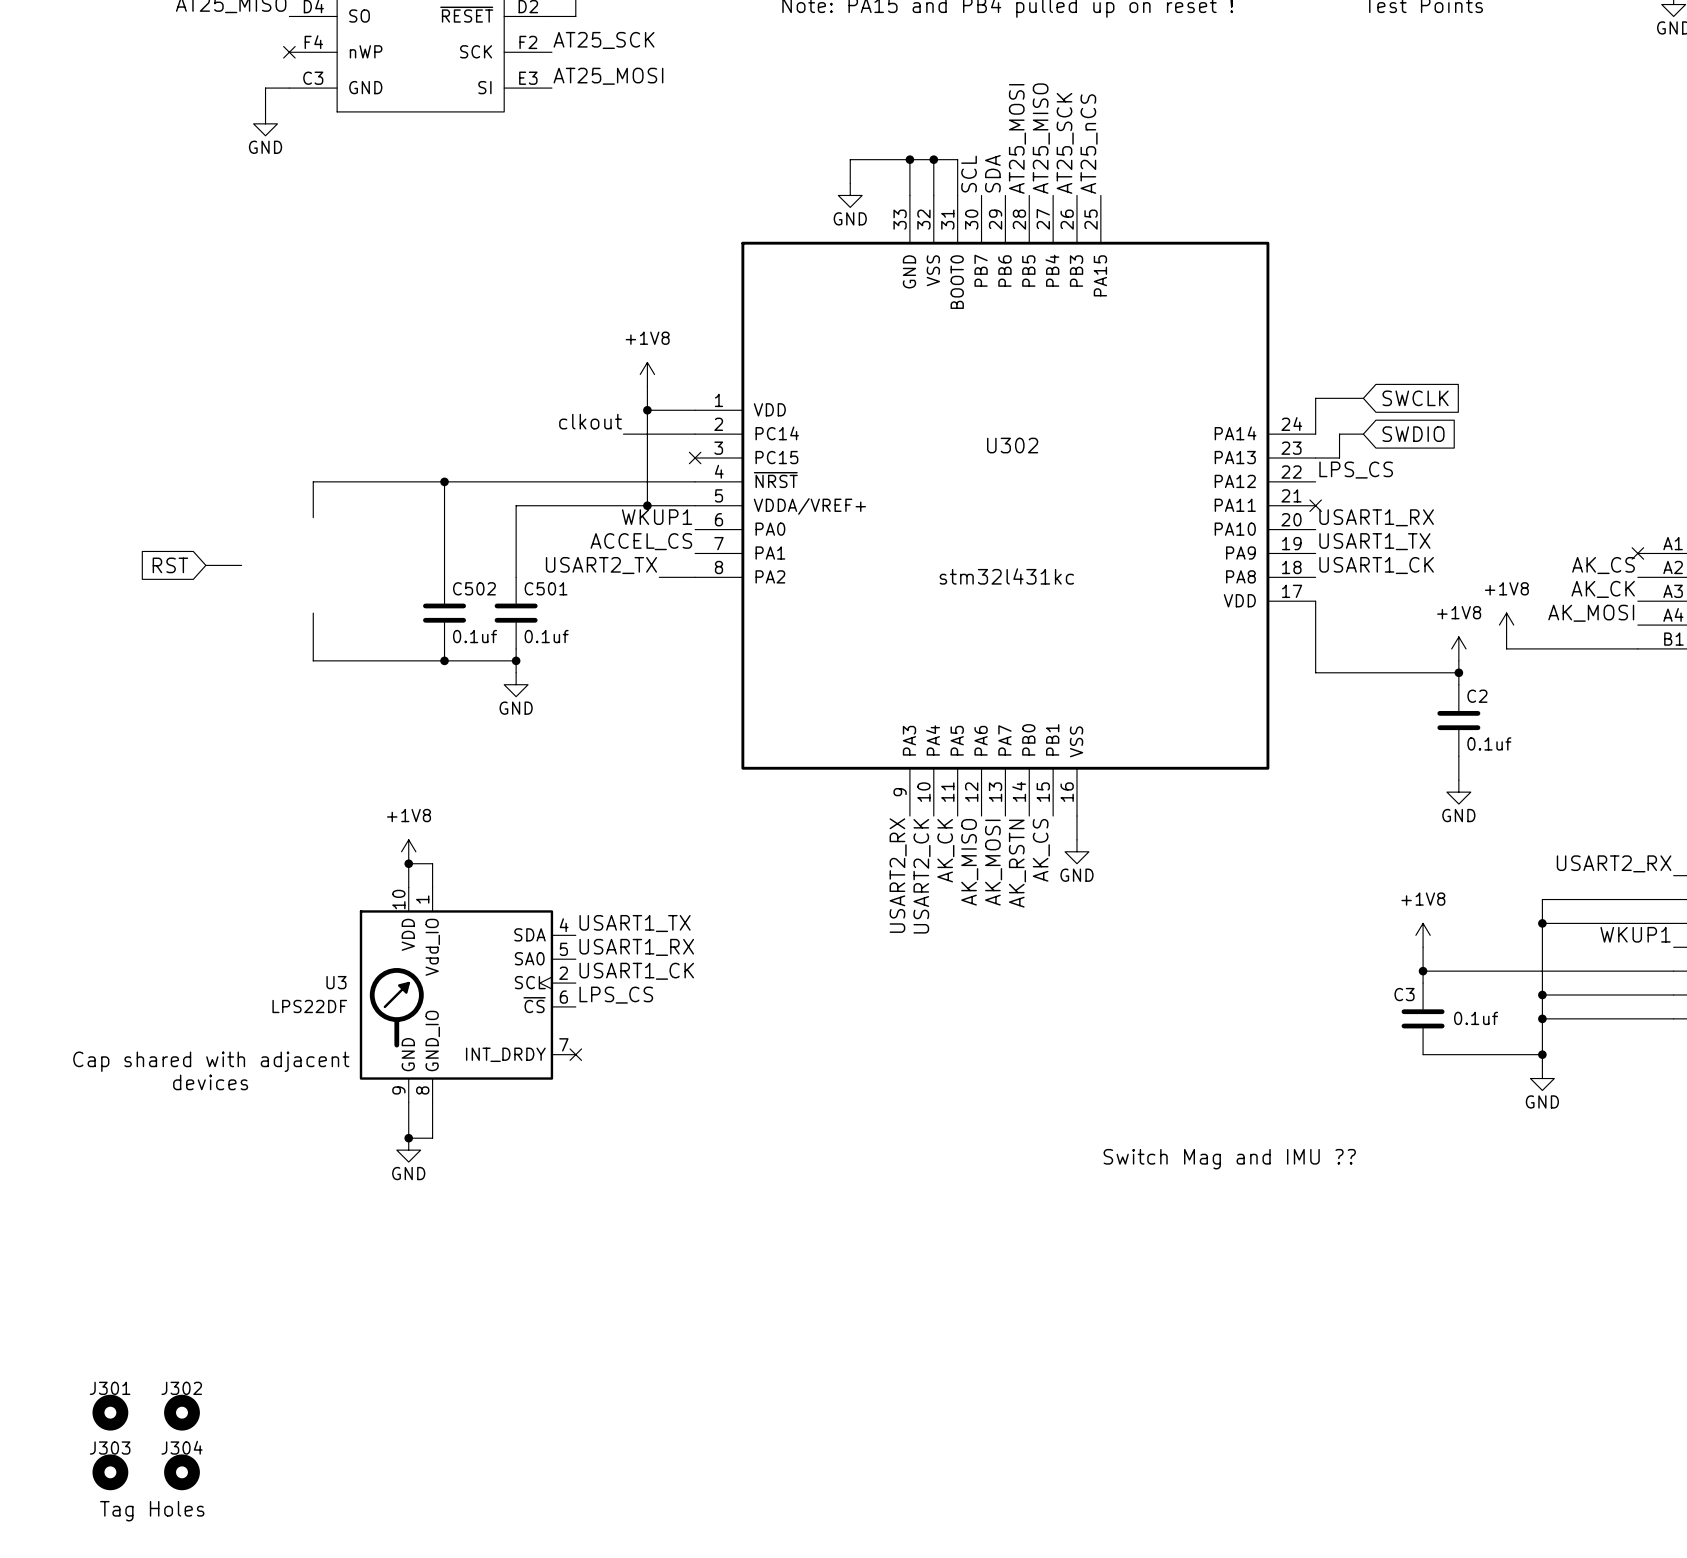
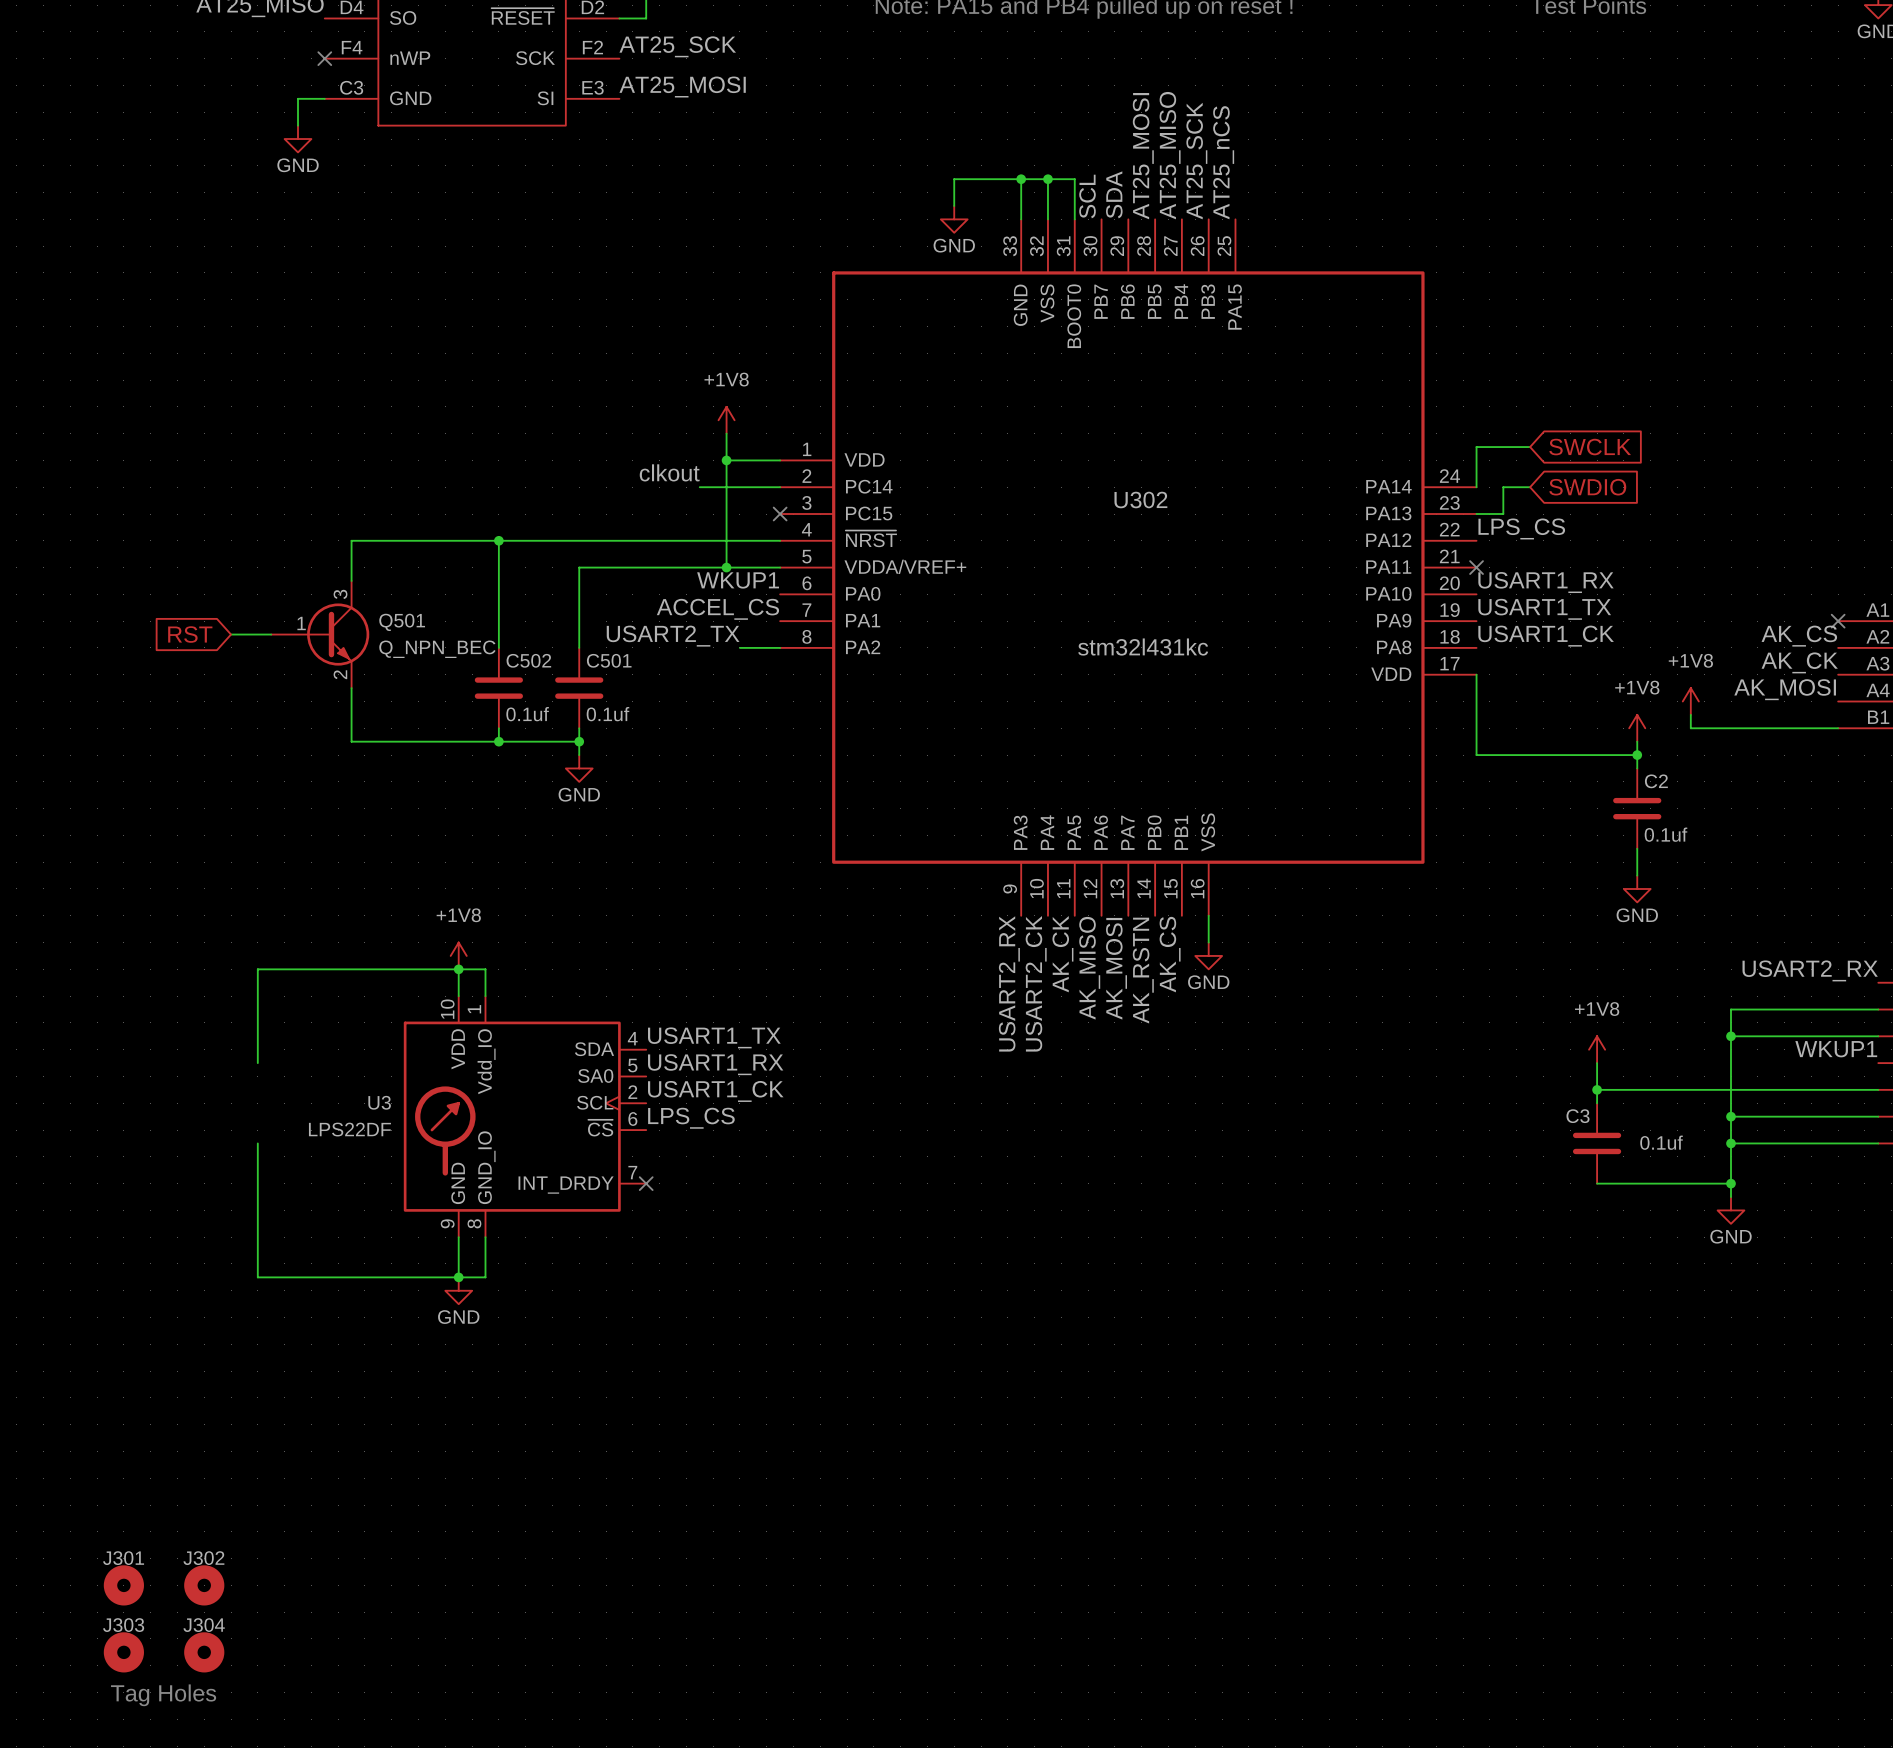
Q501: none -> Q_NPN_BEC (320, 634)
wire: none -> (458, 969) (257, 969) (257, 1063)
wire: none -> (257, 1143) (257, 1277) (458, 1277)
text: Cap shared with adjacent (211, 1061) -> none
text: devices (210, 1082) -> none
text: Switch Mag and IMU ?? (1229, 1159) -> none

